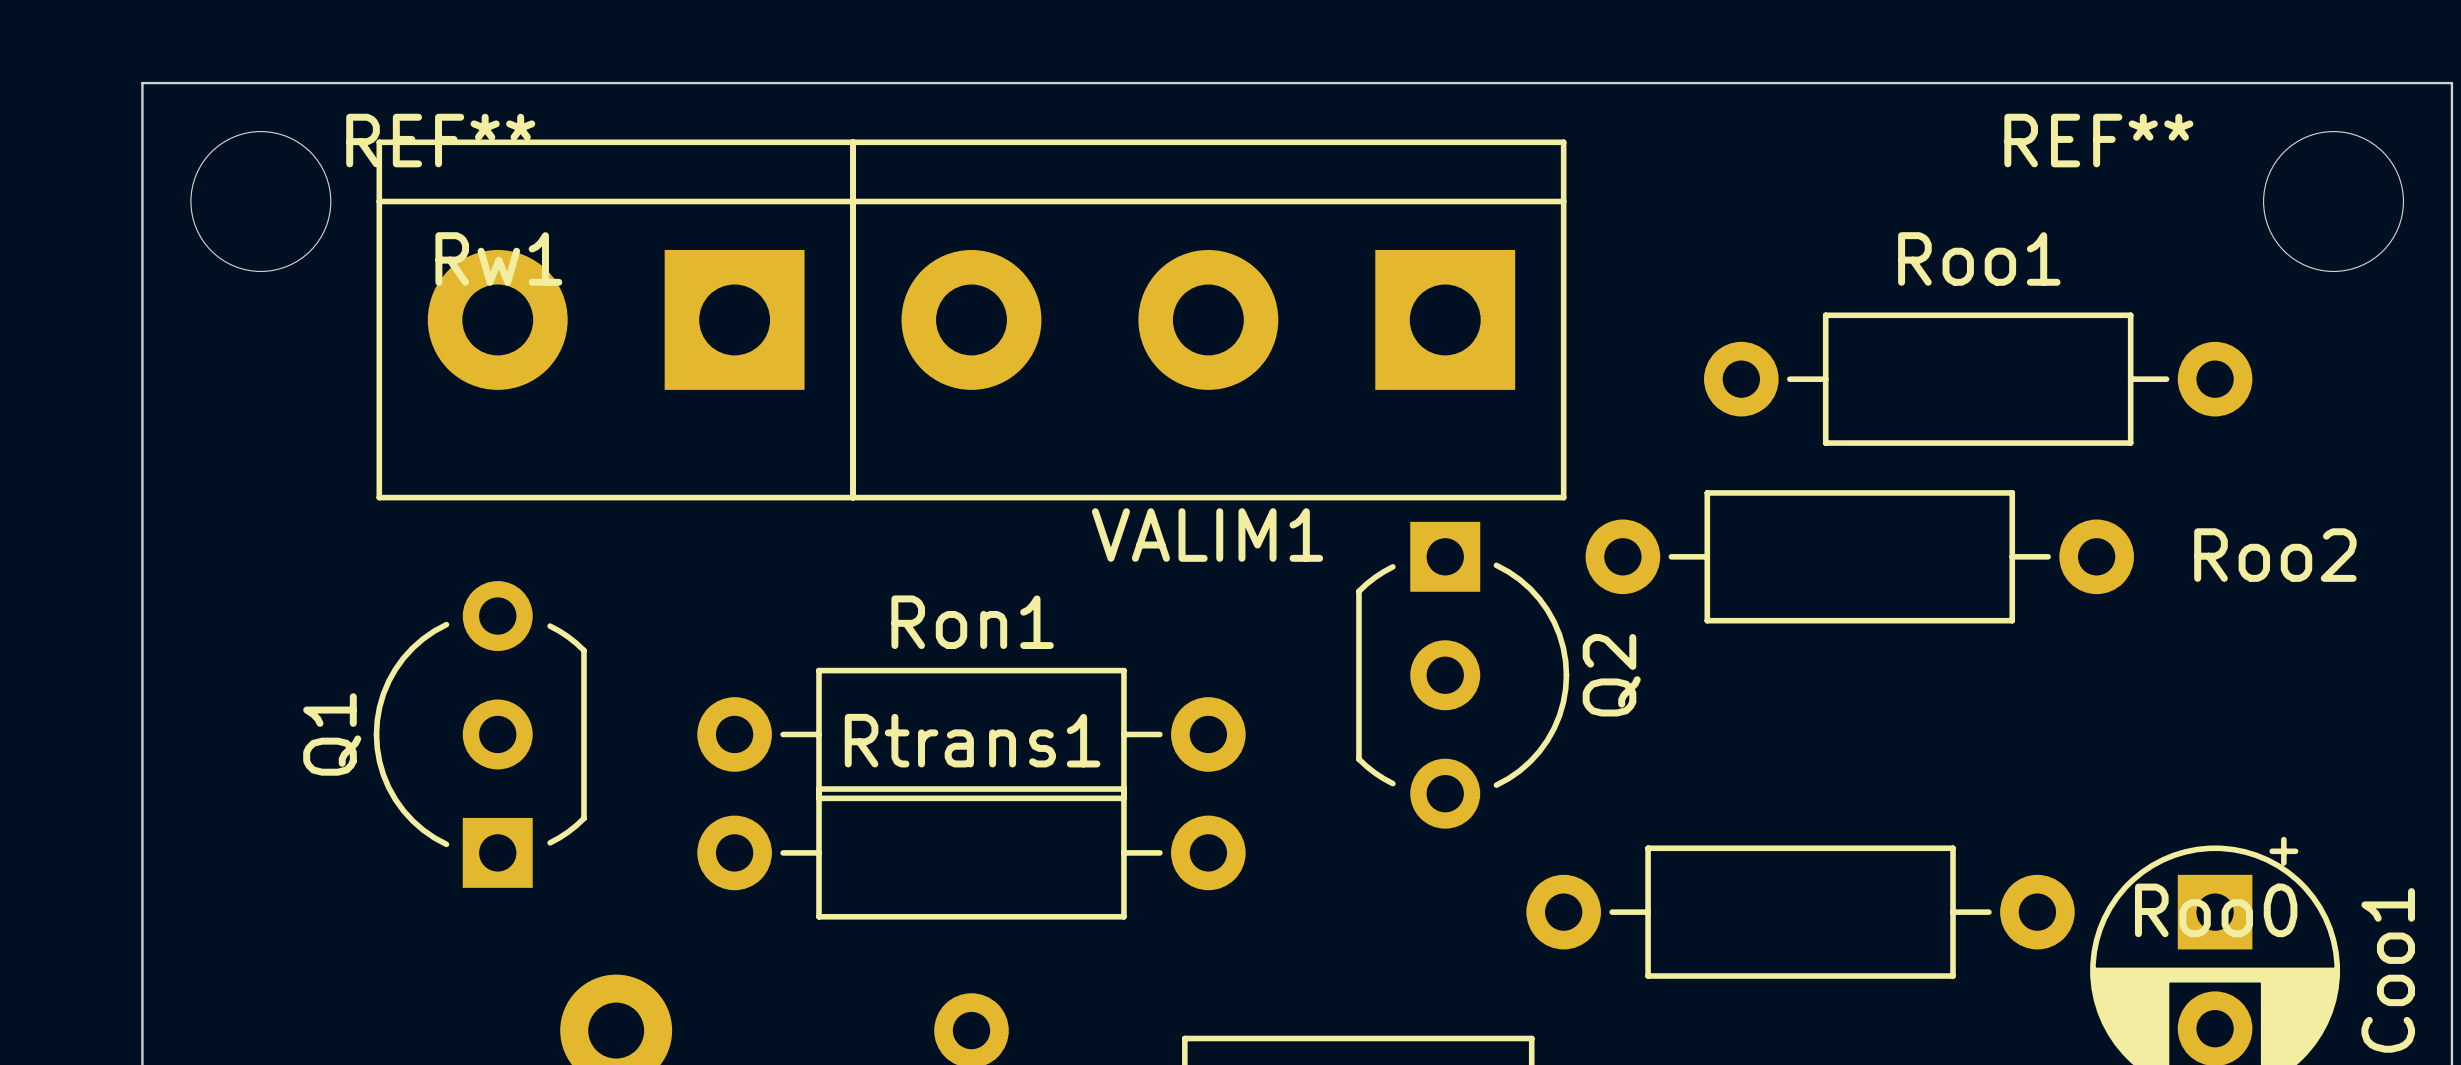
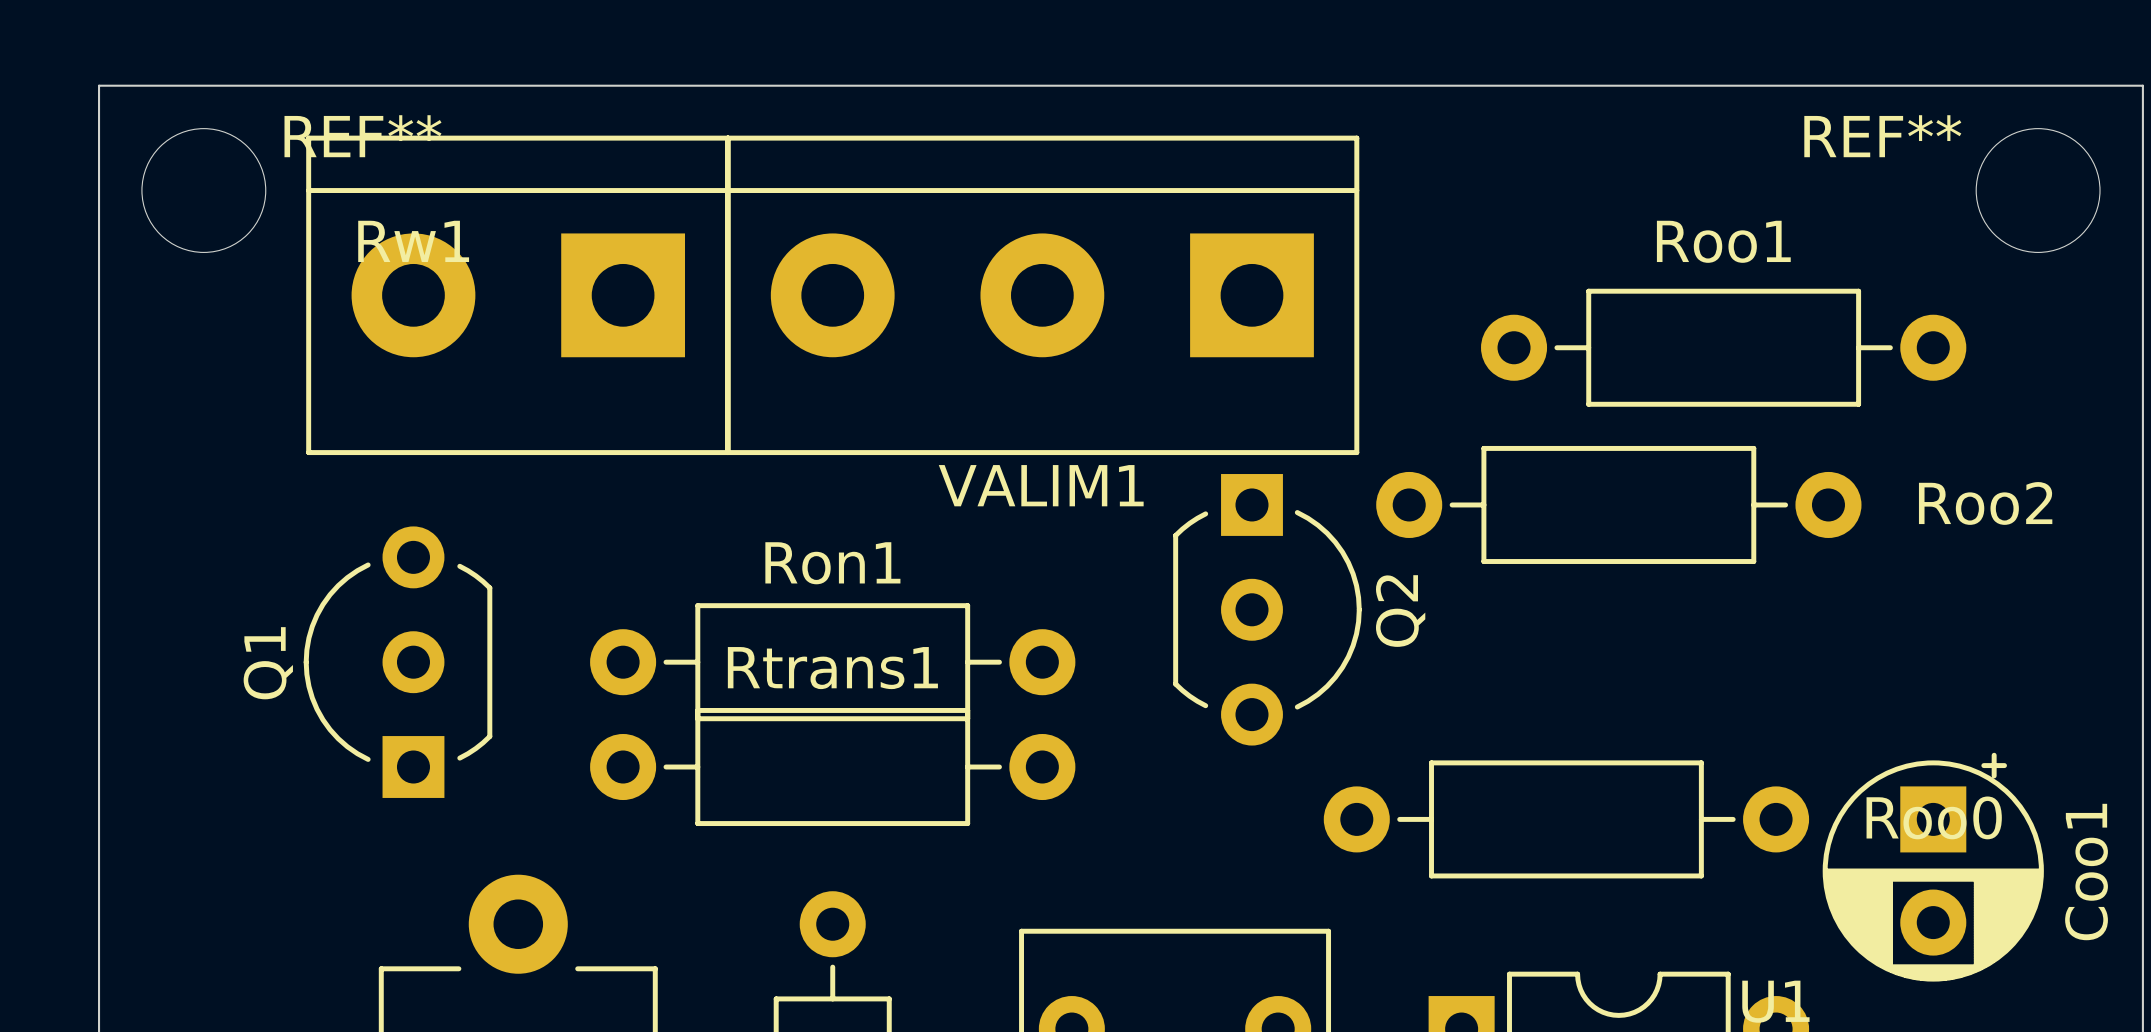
REF** name position: REF** (2098, 140) -> REF** (1882, 136)

